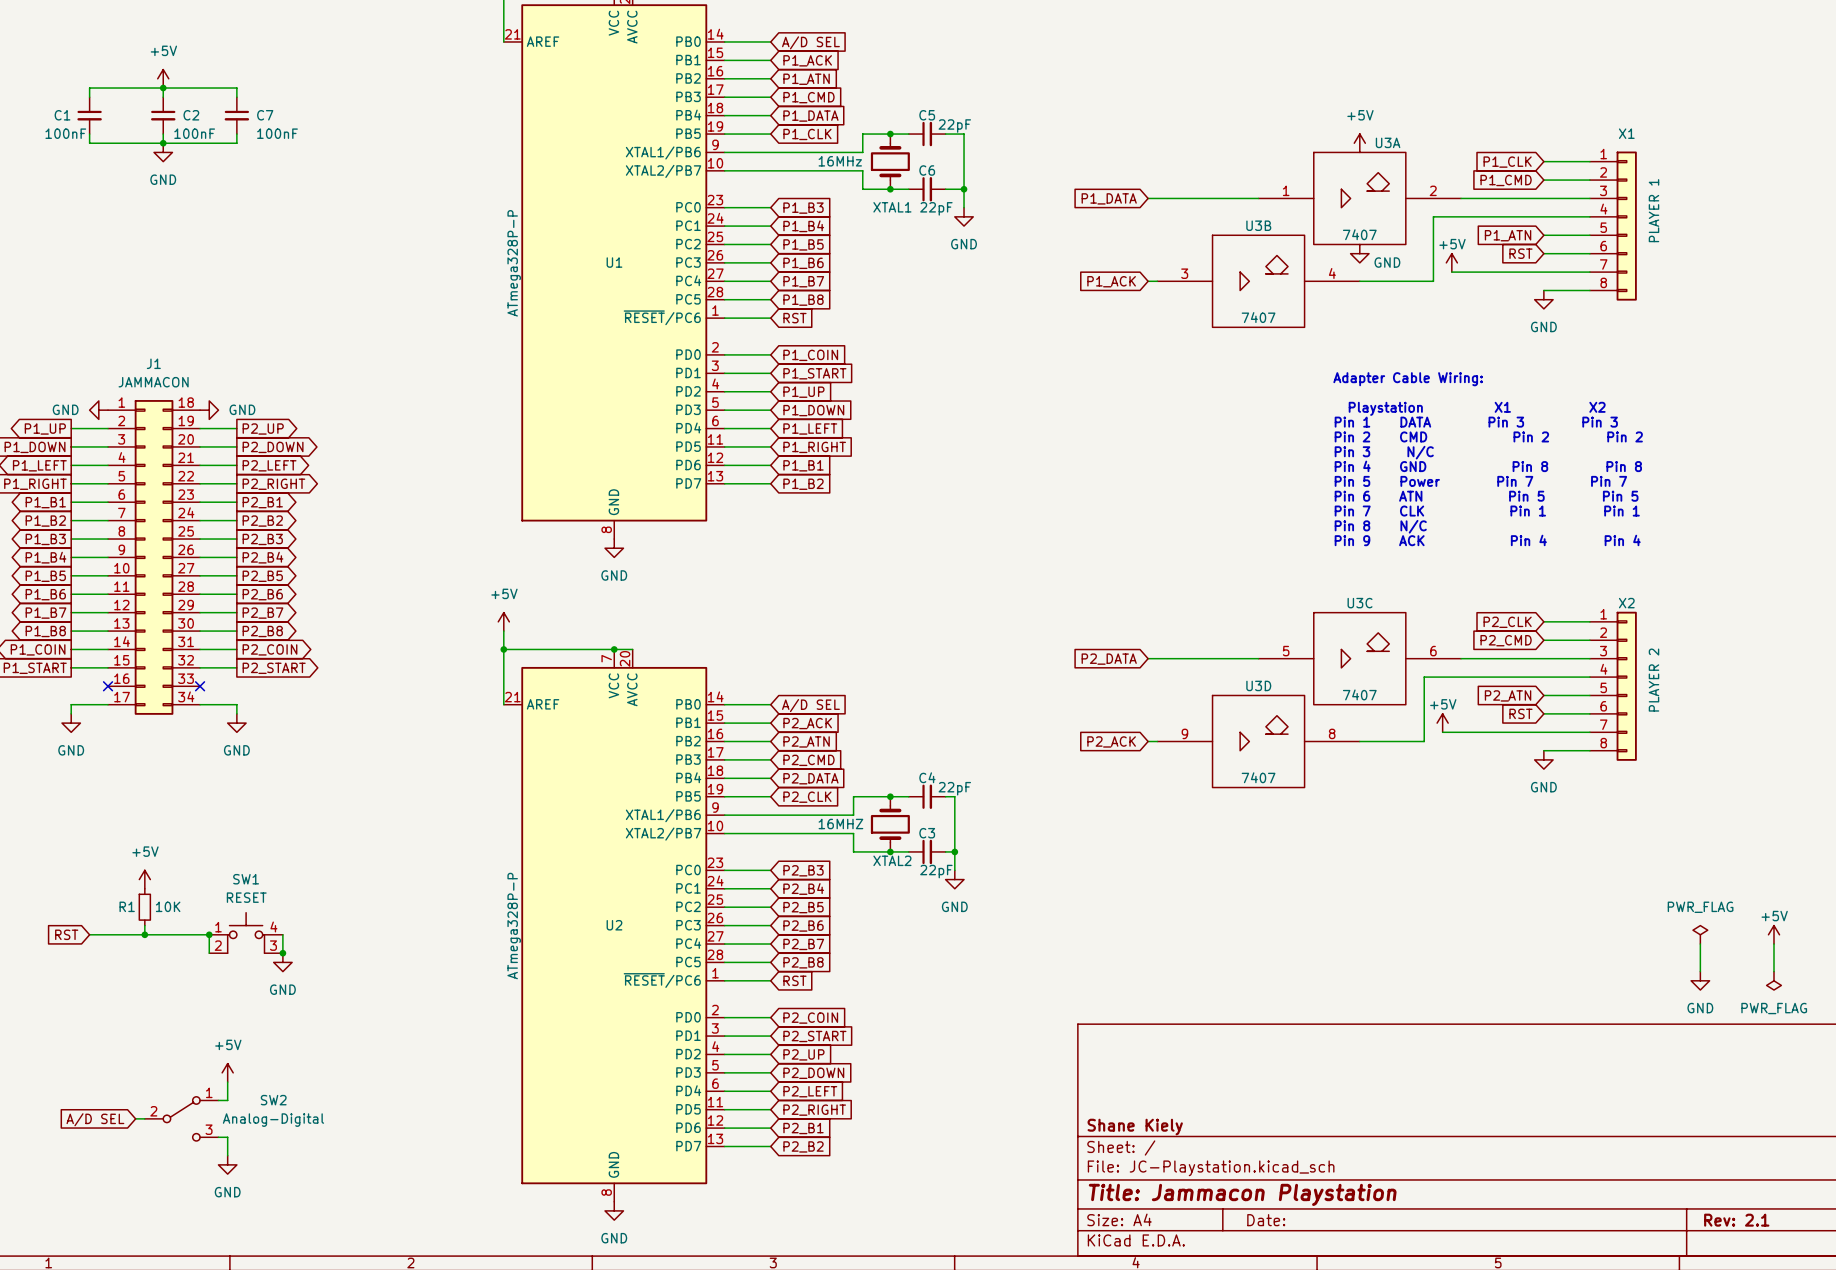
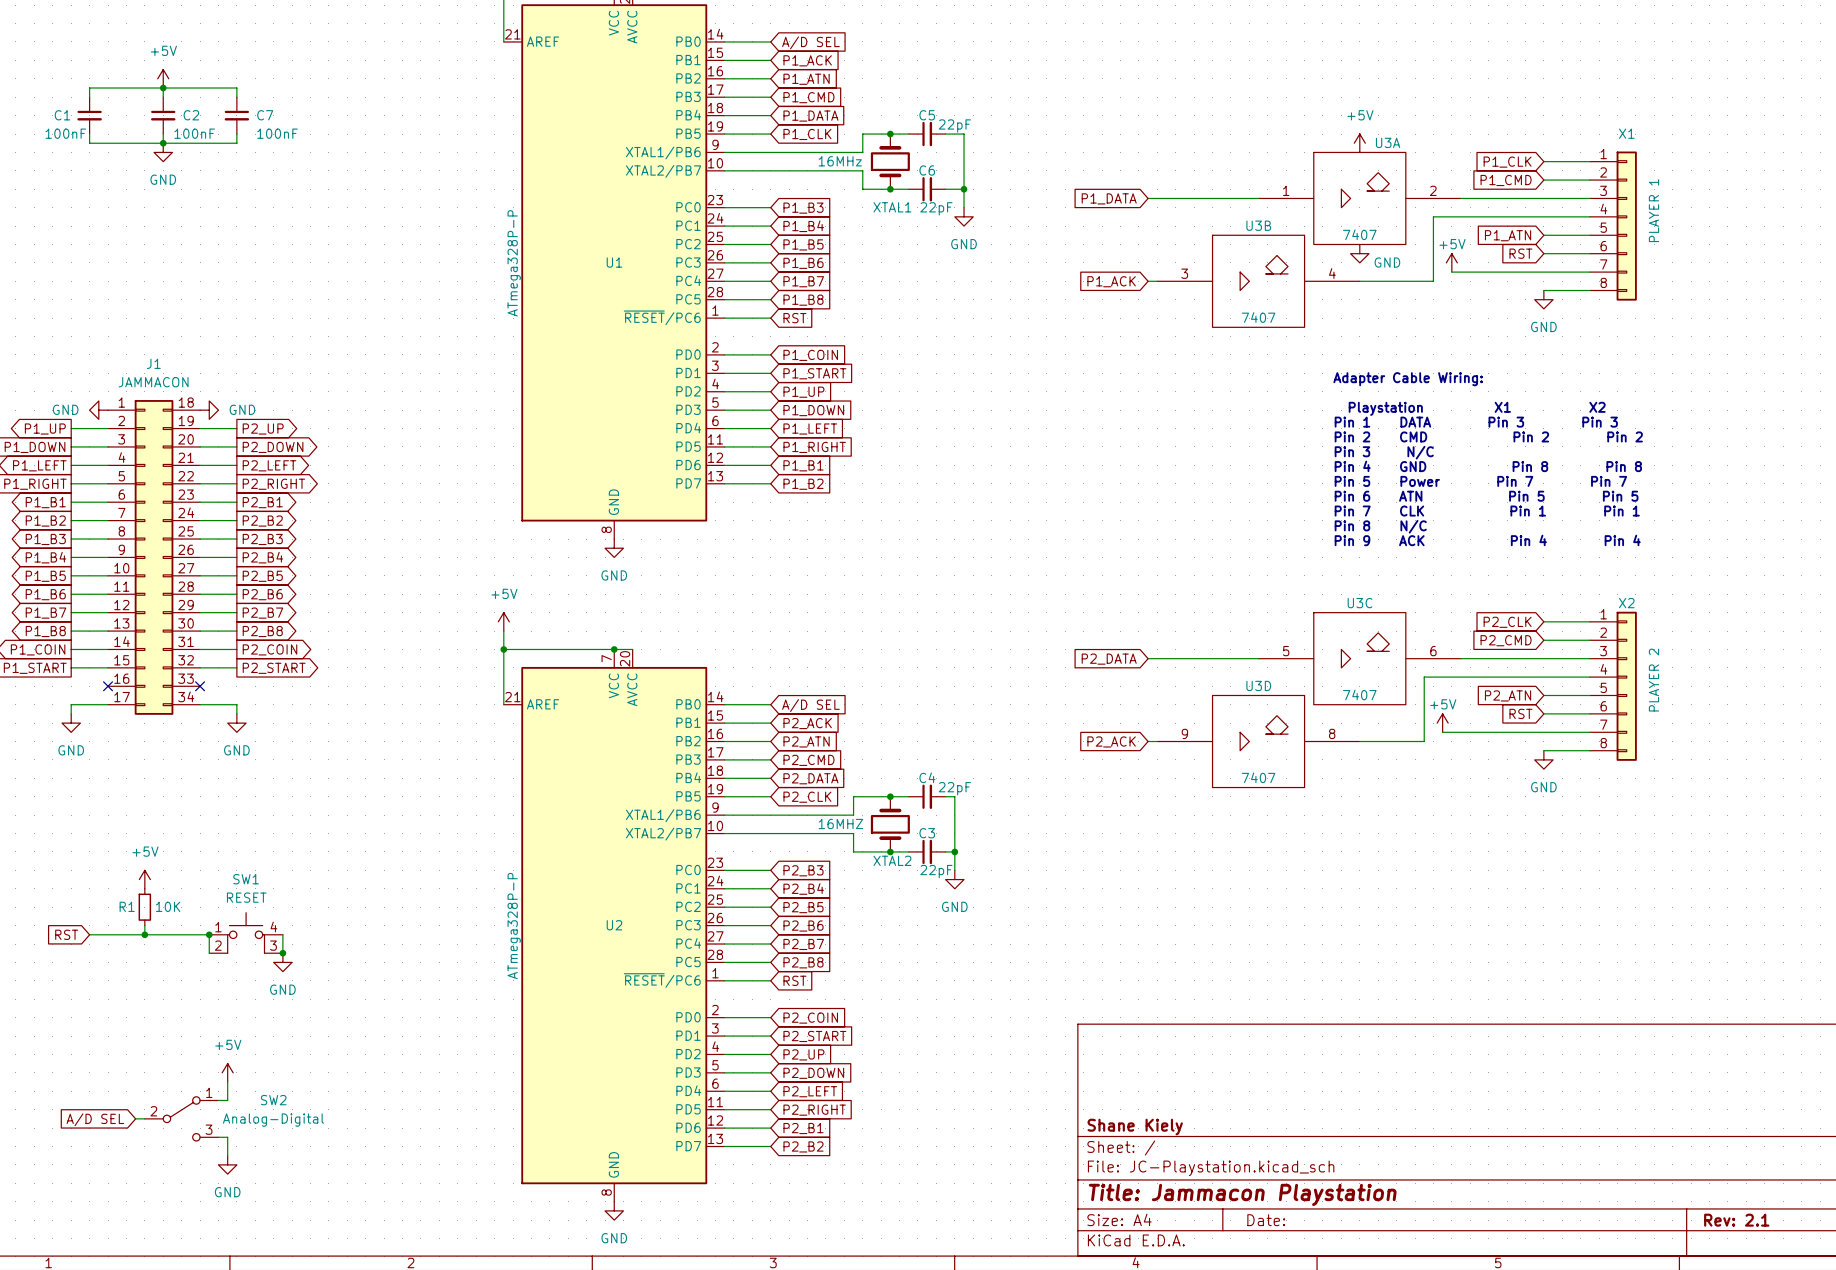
power symbol: PWR_FLAG (1700, 934) -> none
power symbol: +5V (1773, 934) -> none
wire: (1700, 944) (1700, 971) -> none
wire: (1773, 944) (1773, 971) -> none
power symbol: GND (1700, 980) -> none
power symbol: PWR_FLAG (1773, 980) -> none

